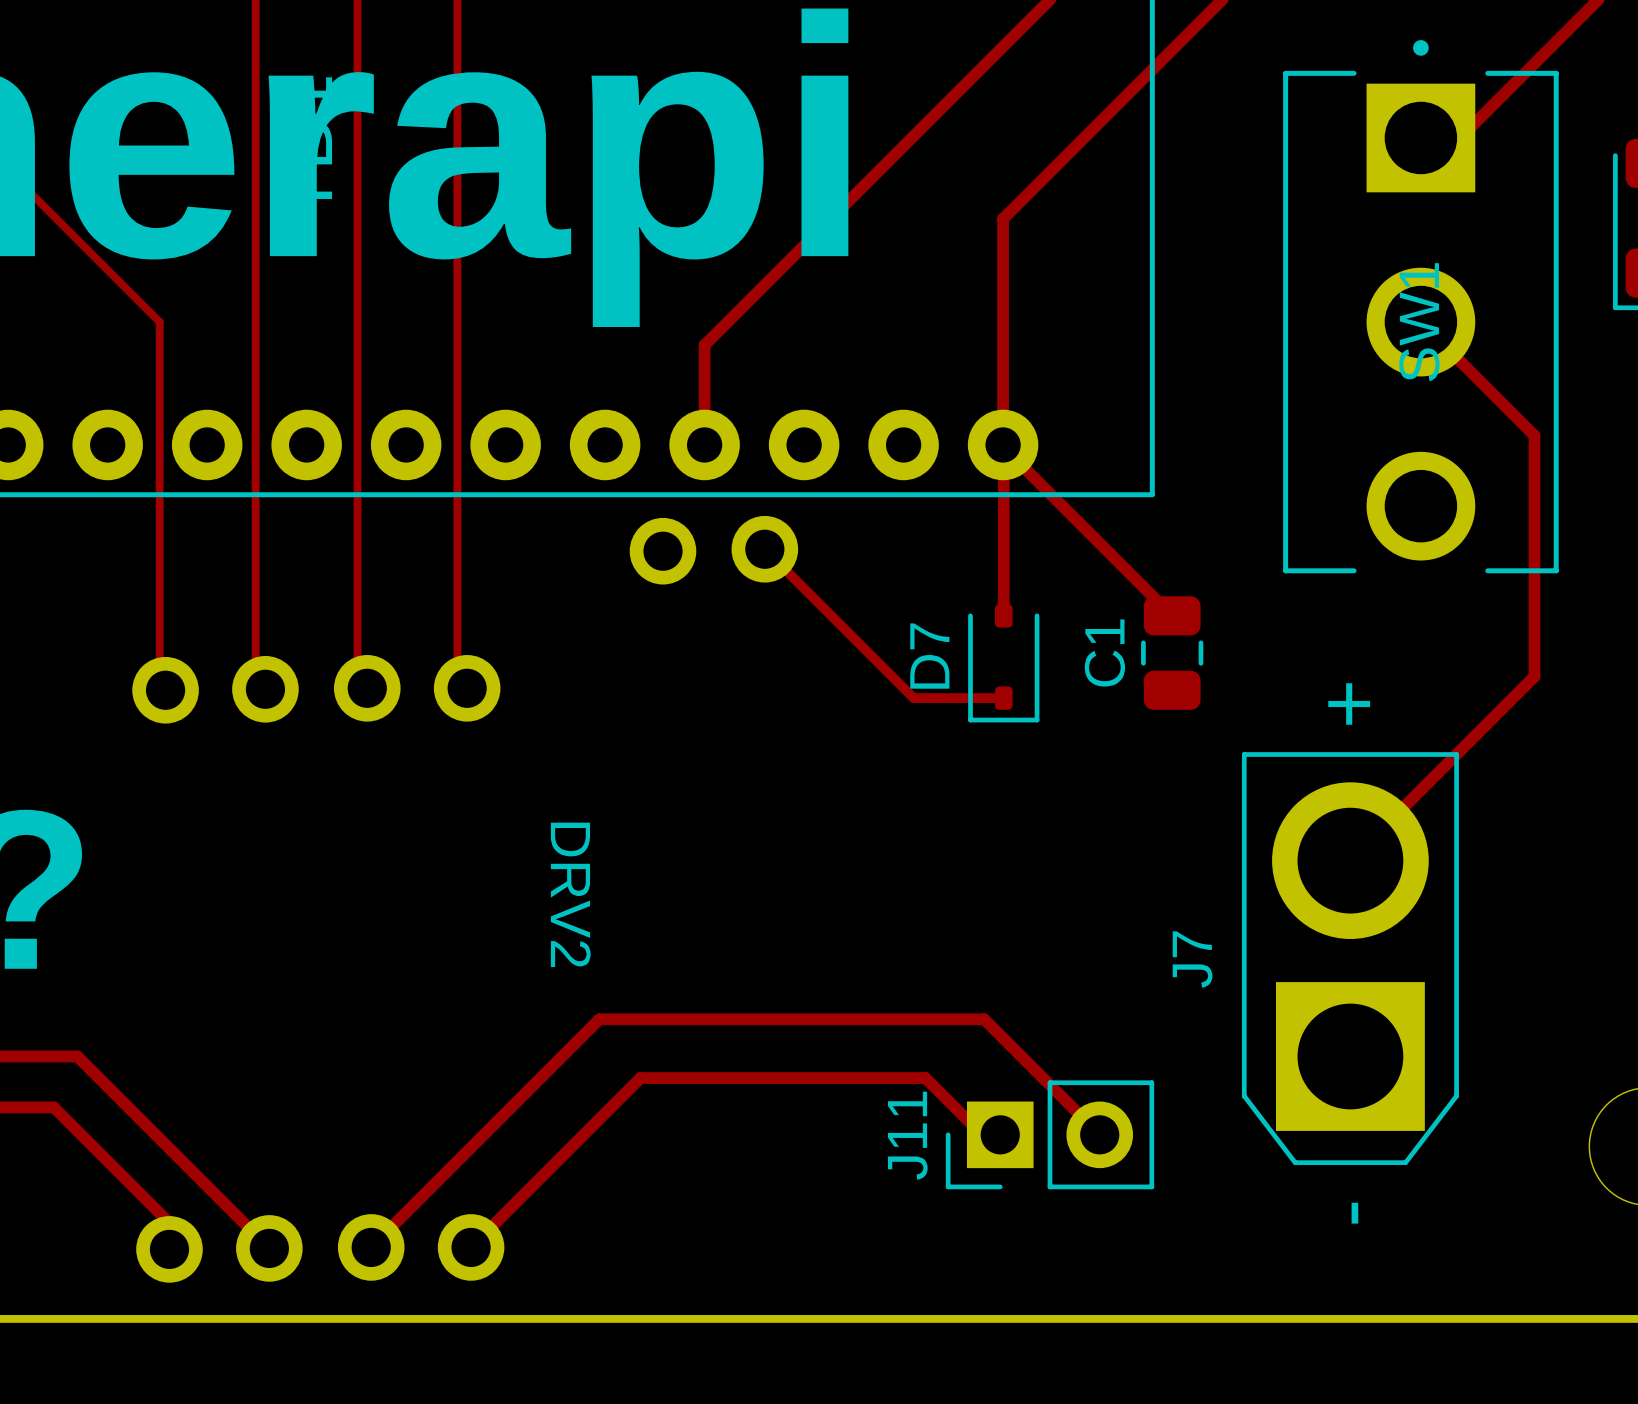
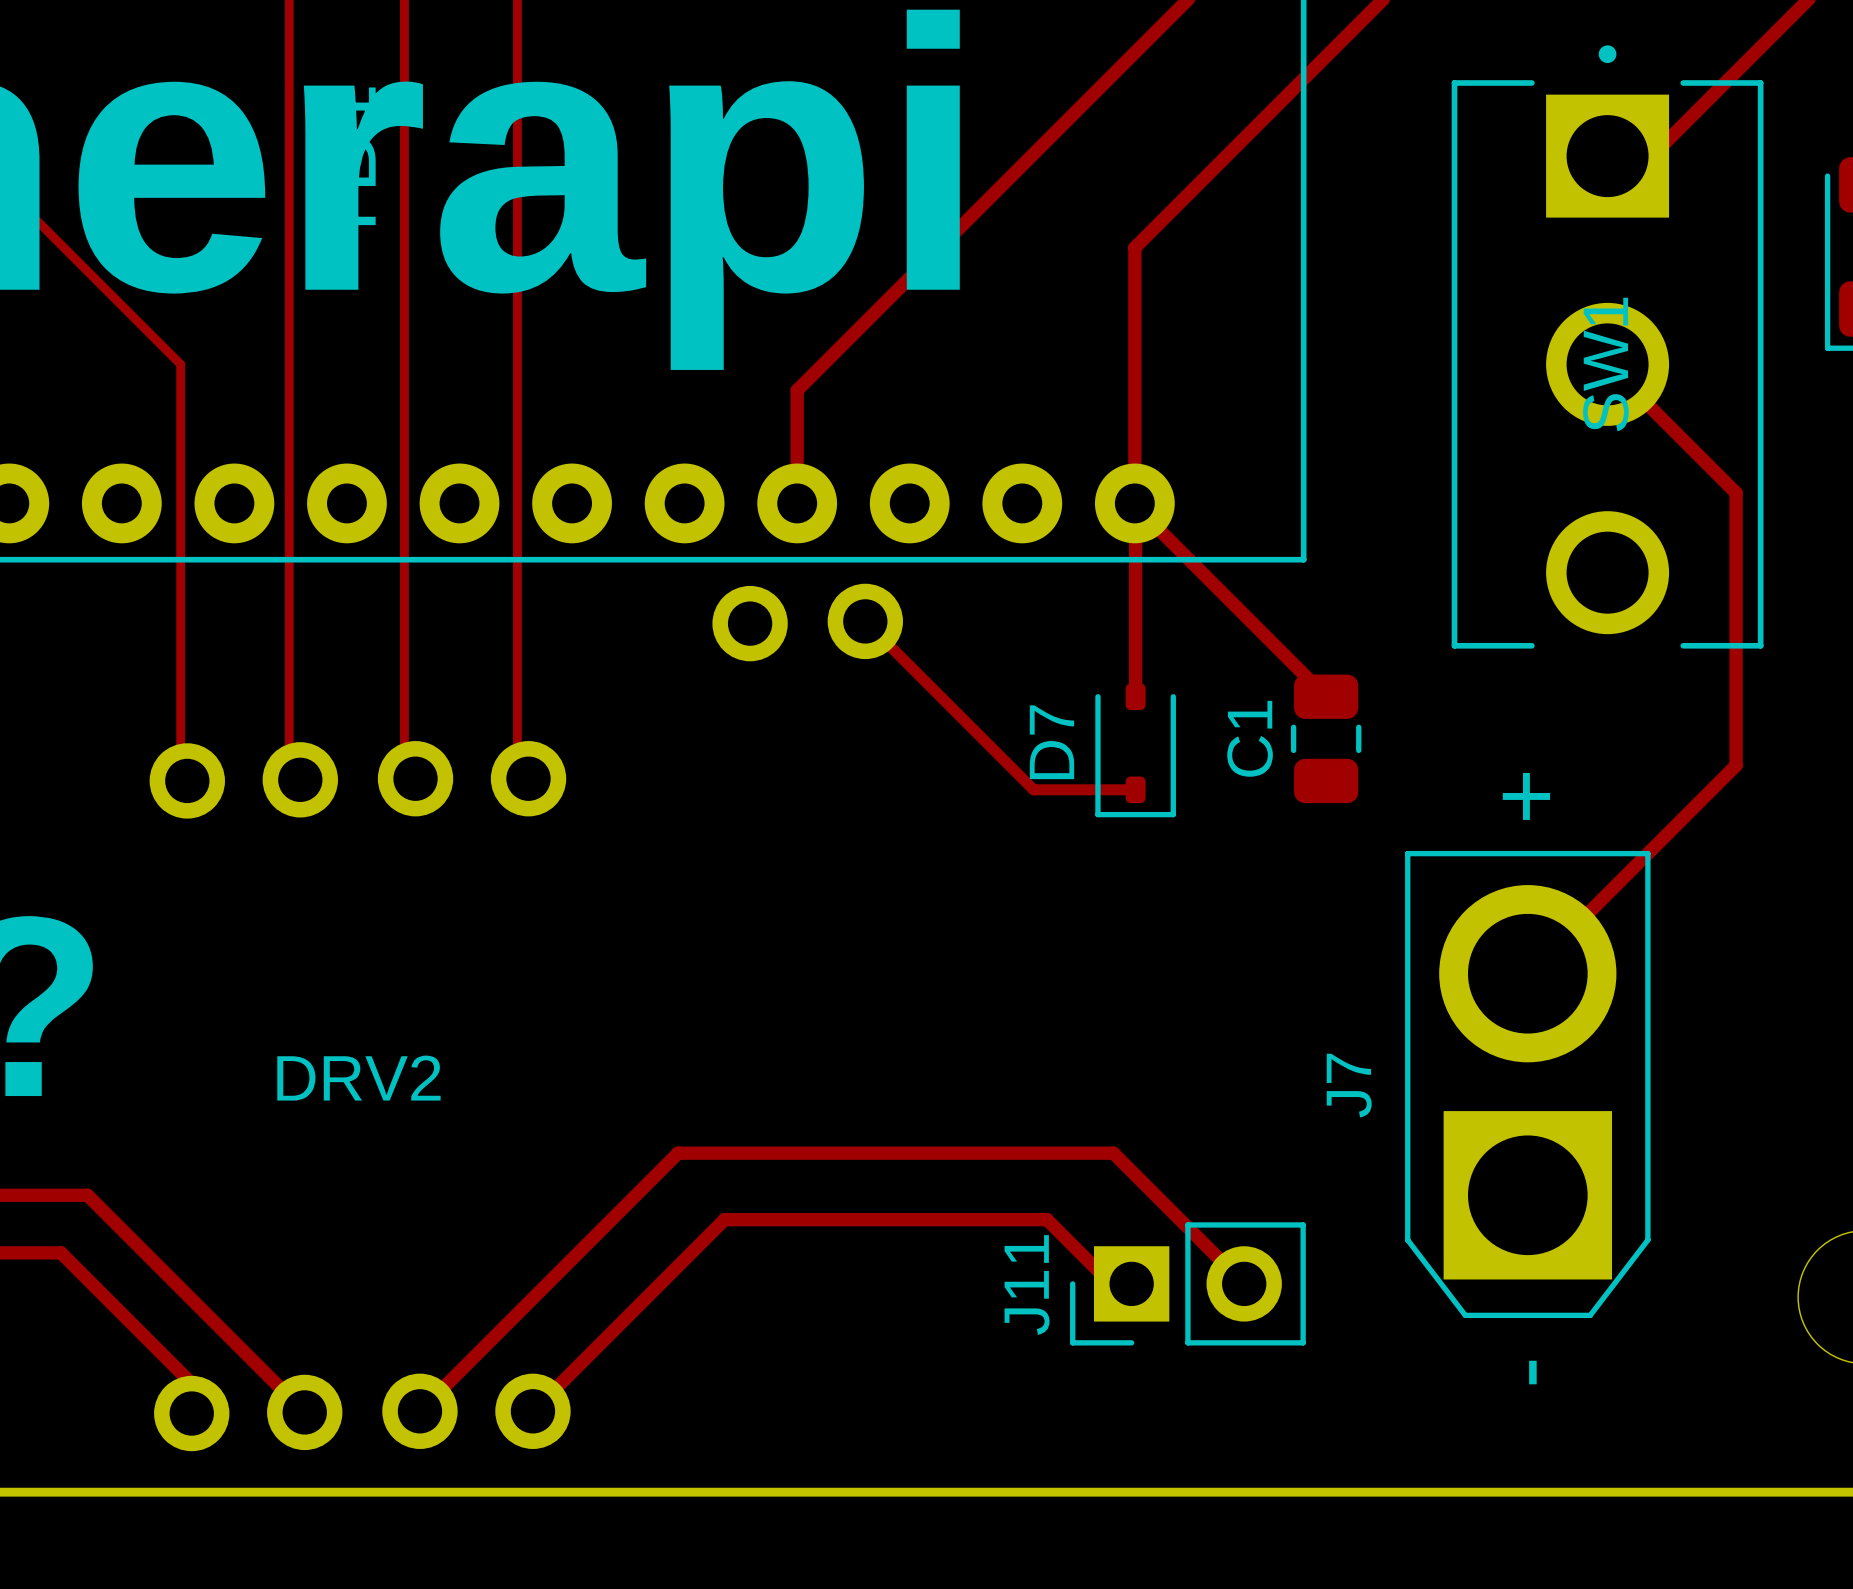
DRV2 name rotation: 0° (570, 894) -> 90° counterclockwise (358, 1078)
DRV2 name position: DRV2 (570, 894) -> DRV2 (358, 1078)

